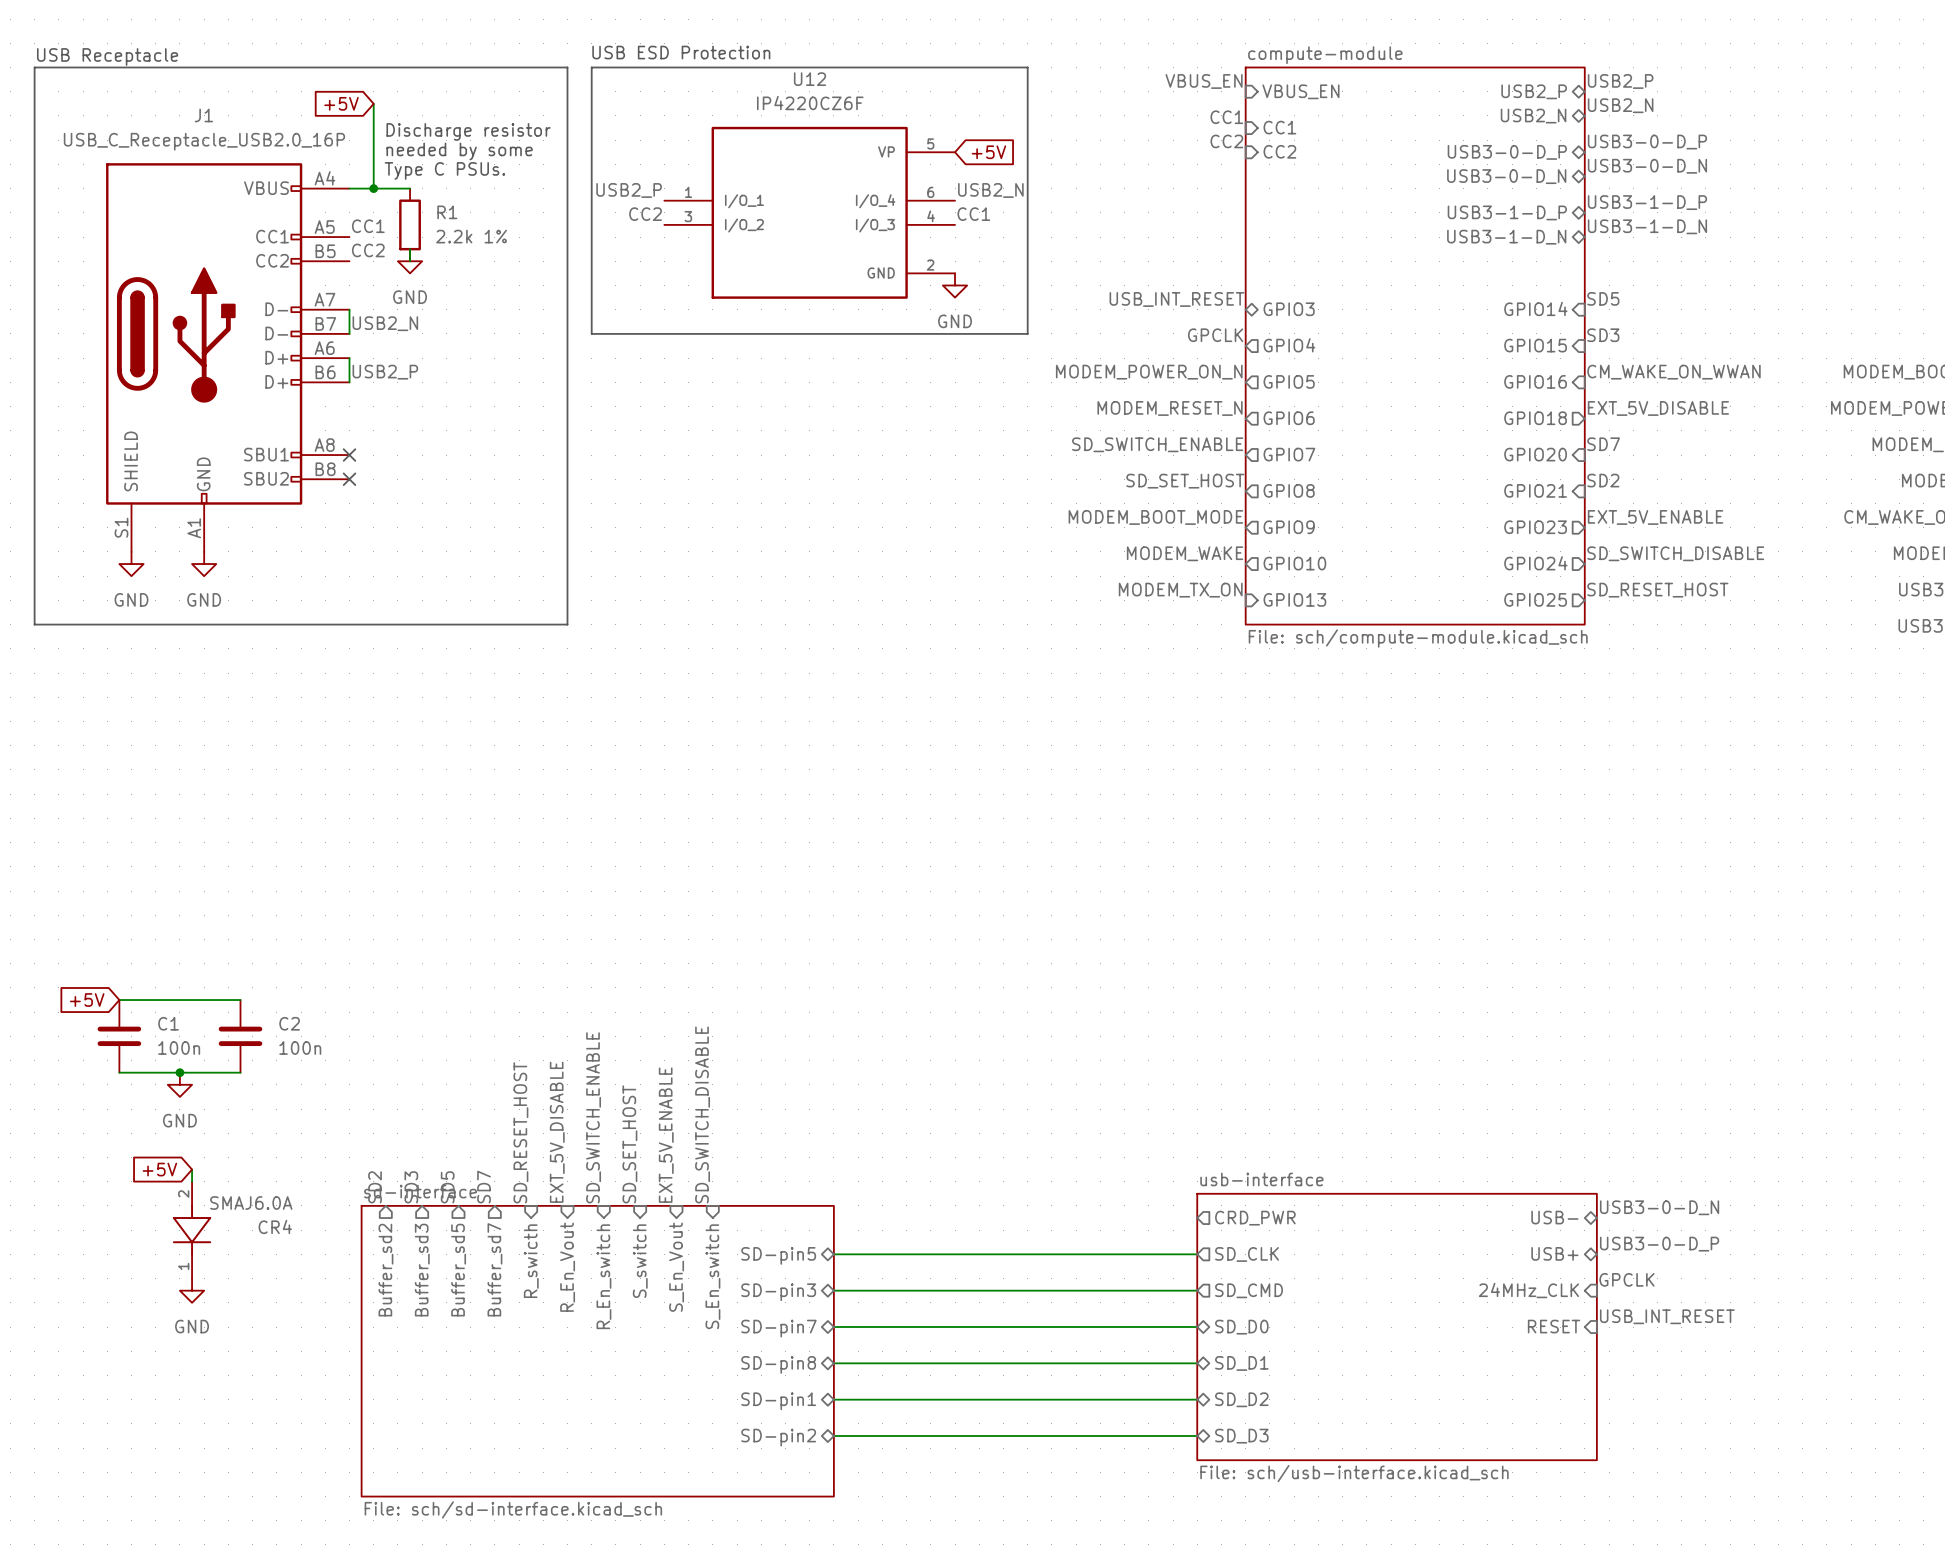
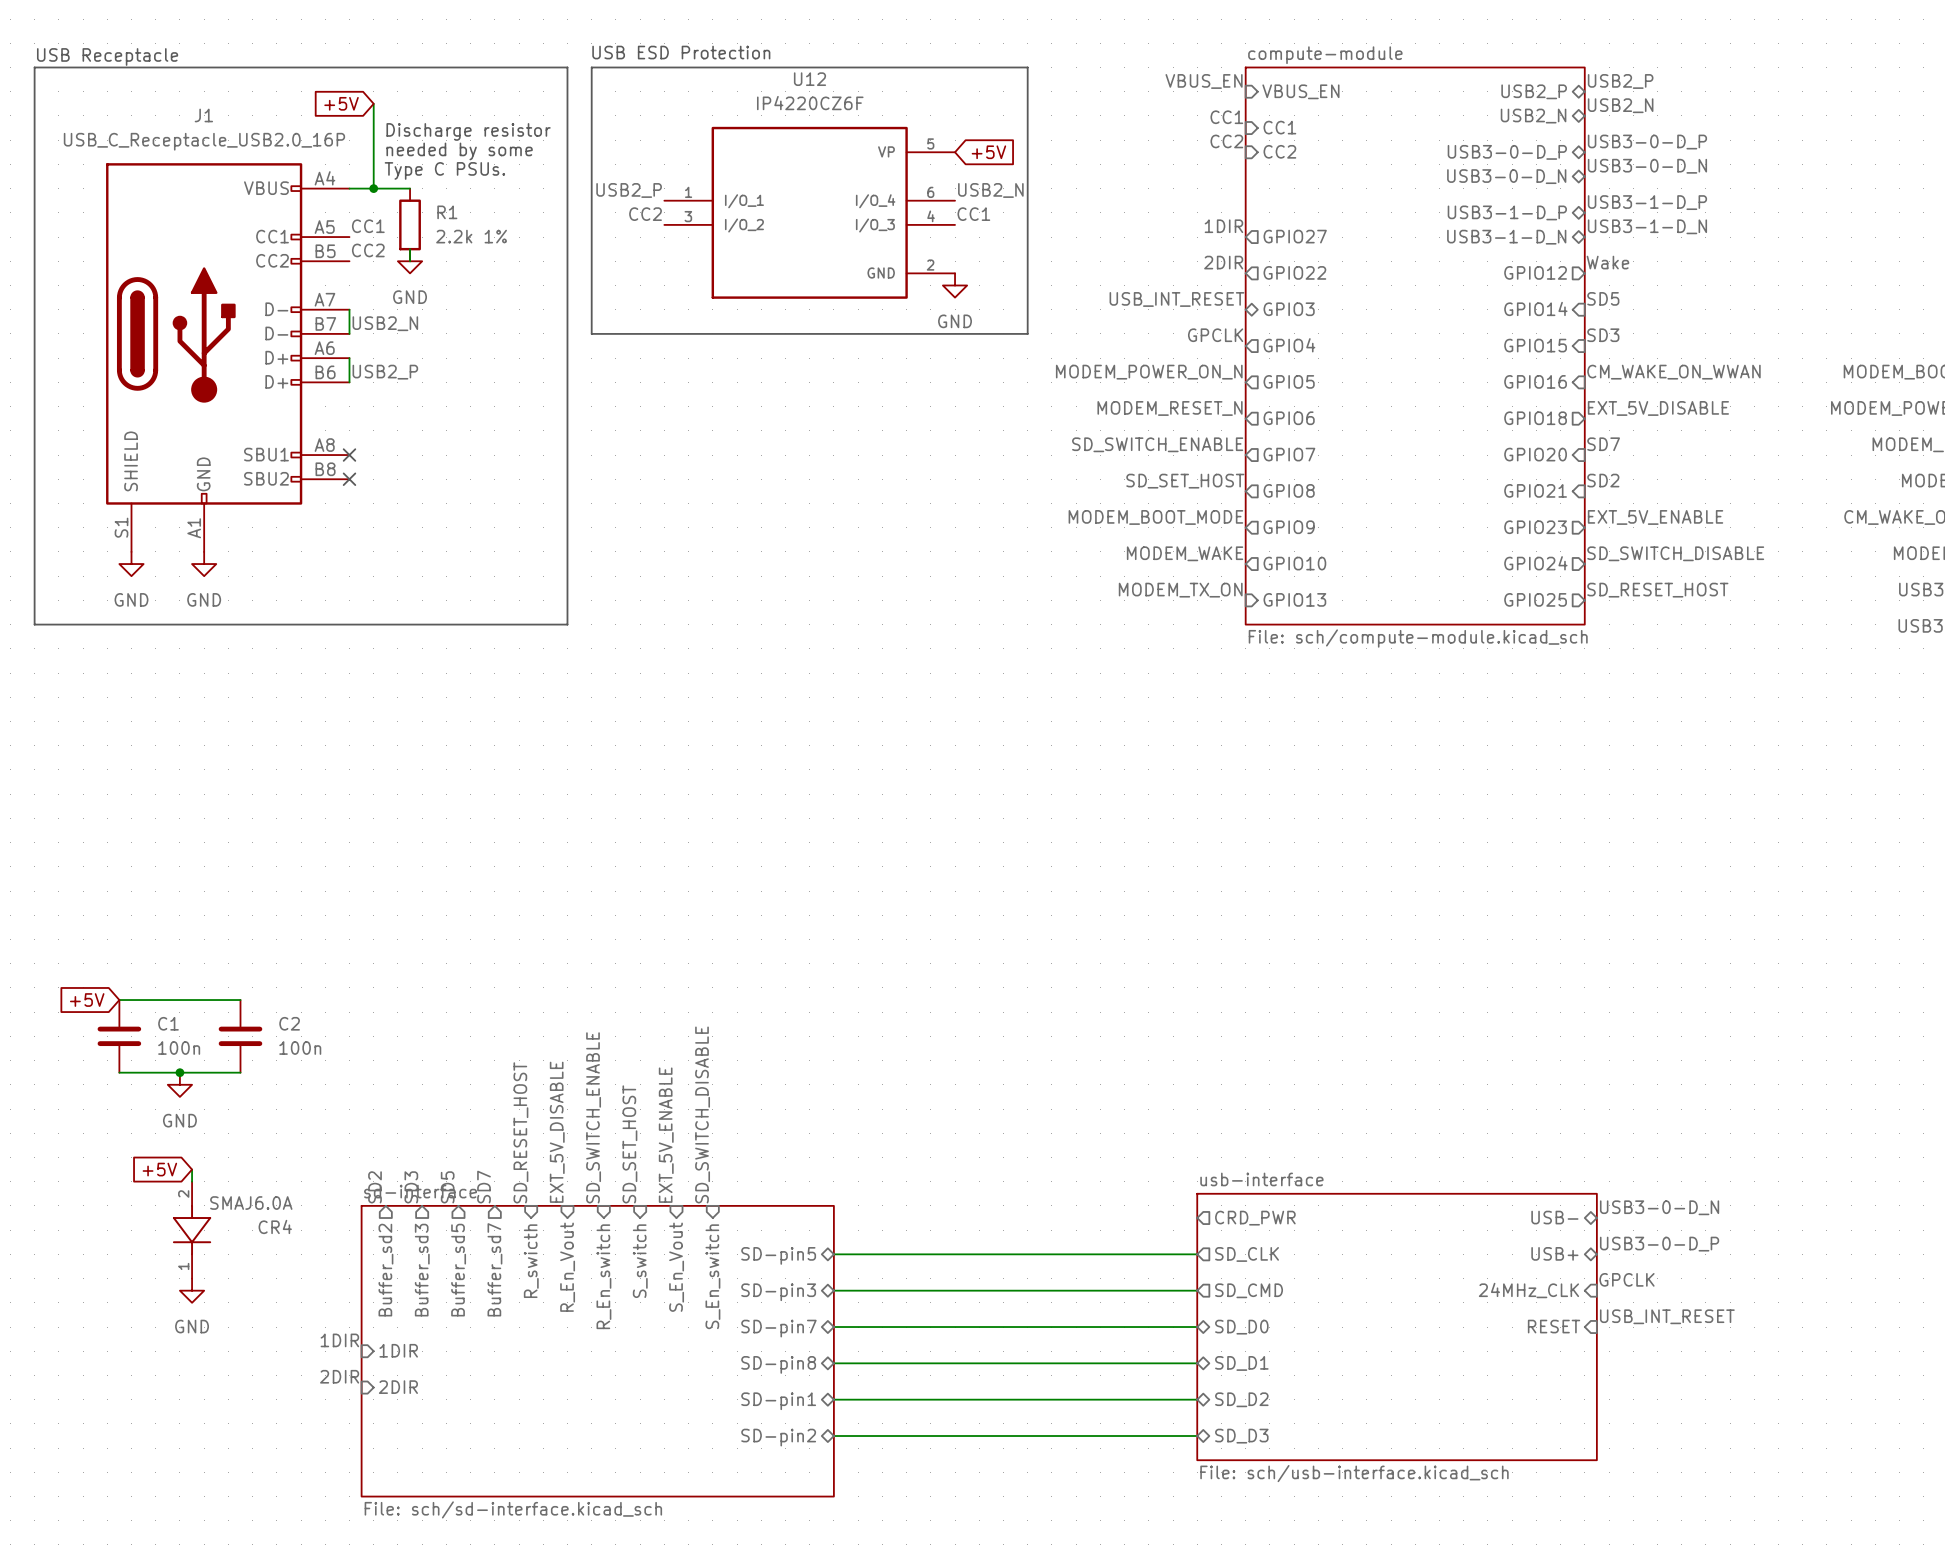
label: none -> 1DIR (1223, 226)
sheet pin: none -> GPIO27 (1295, 236)
label: none -> 2DIR (1223, 262)
label: none -> Wake (1607, 262)
sheet pin: none -> GPIO22 (1294, 272)
sheet pin: none -> GPIO12 (1535, 272)
label: none -> 1DIR (339, 1340)
sheet pin: none -> 1DIR (398, 1350)
label: none -> 2DIR (339, 1376)
sheet pin: none -> 2DIR (398, 1387)

